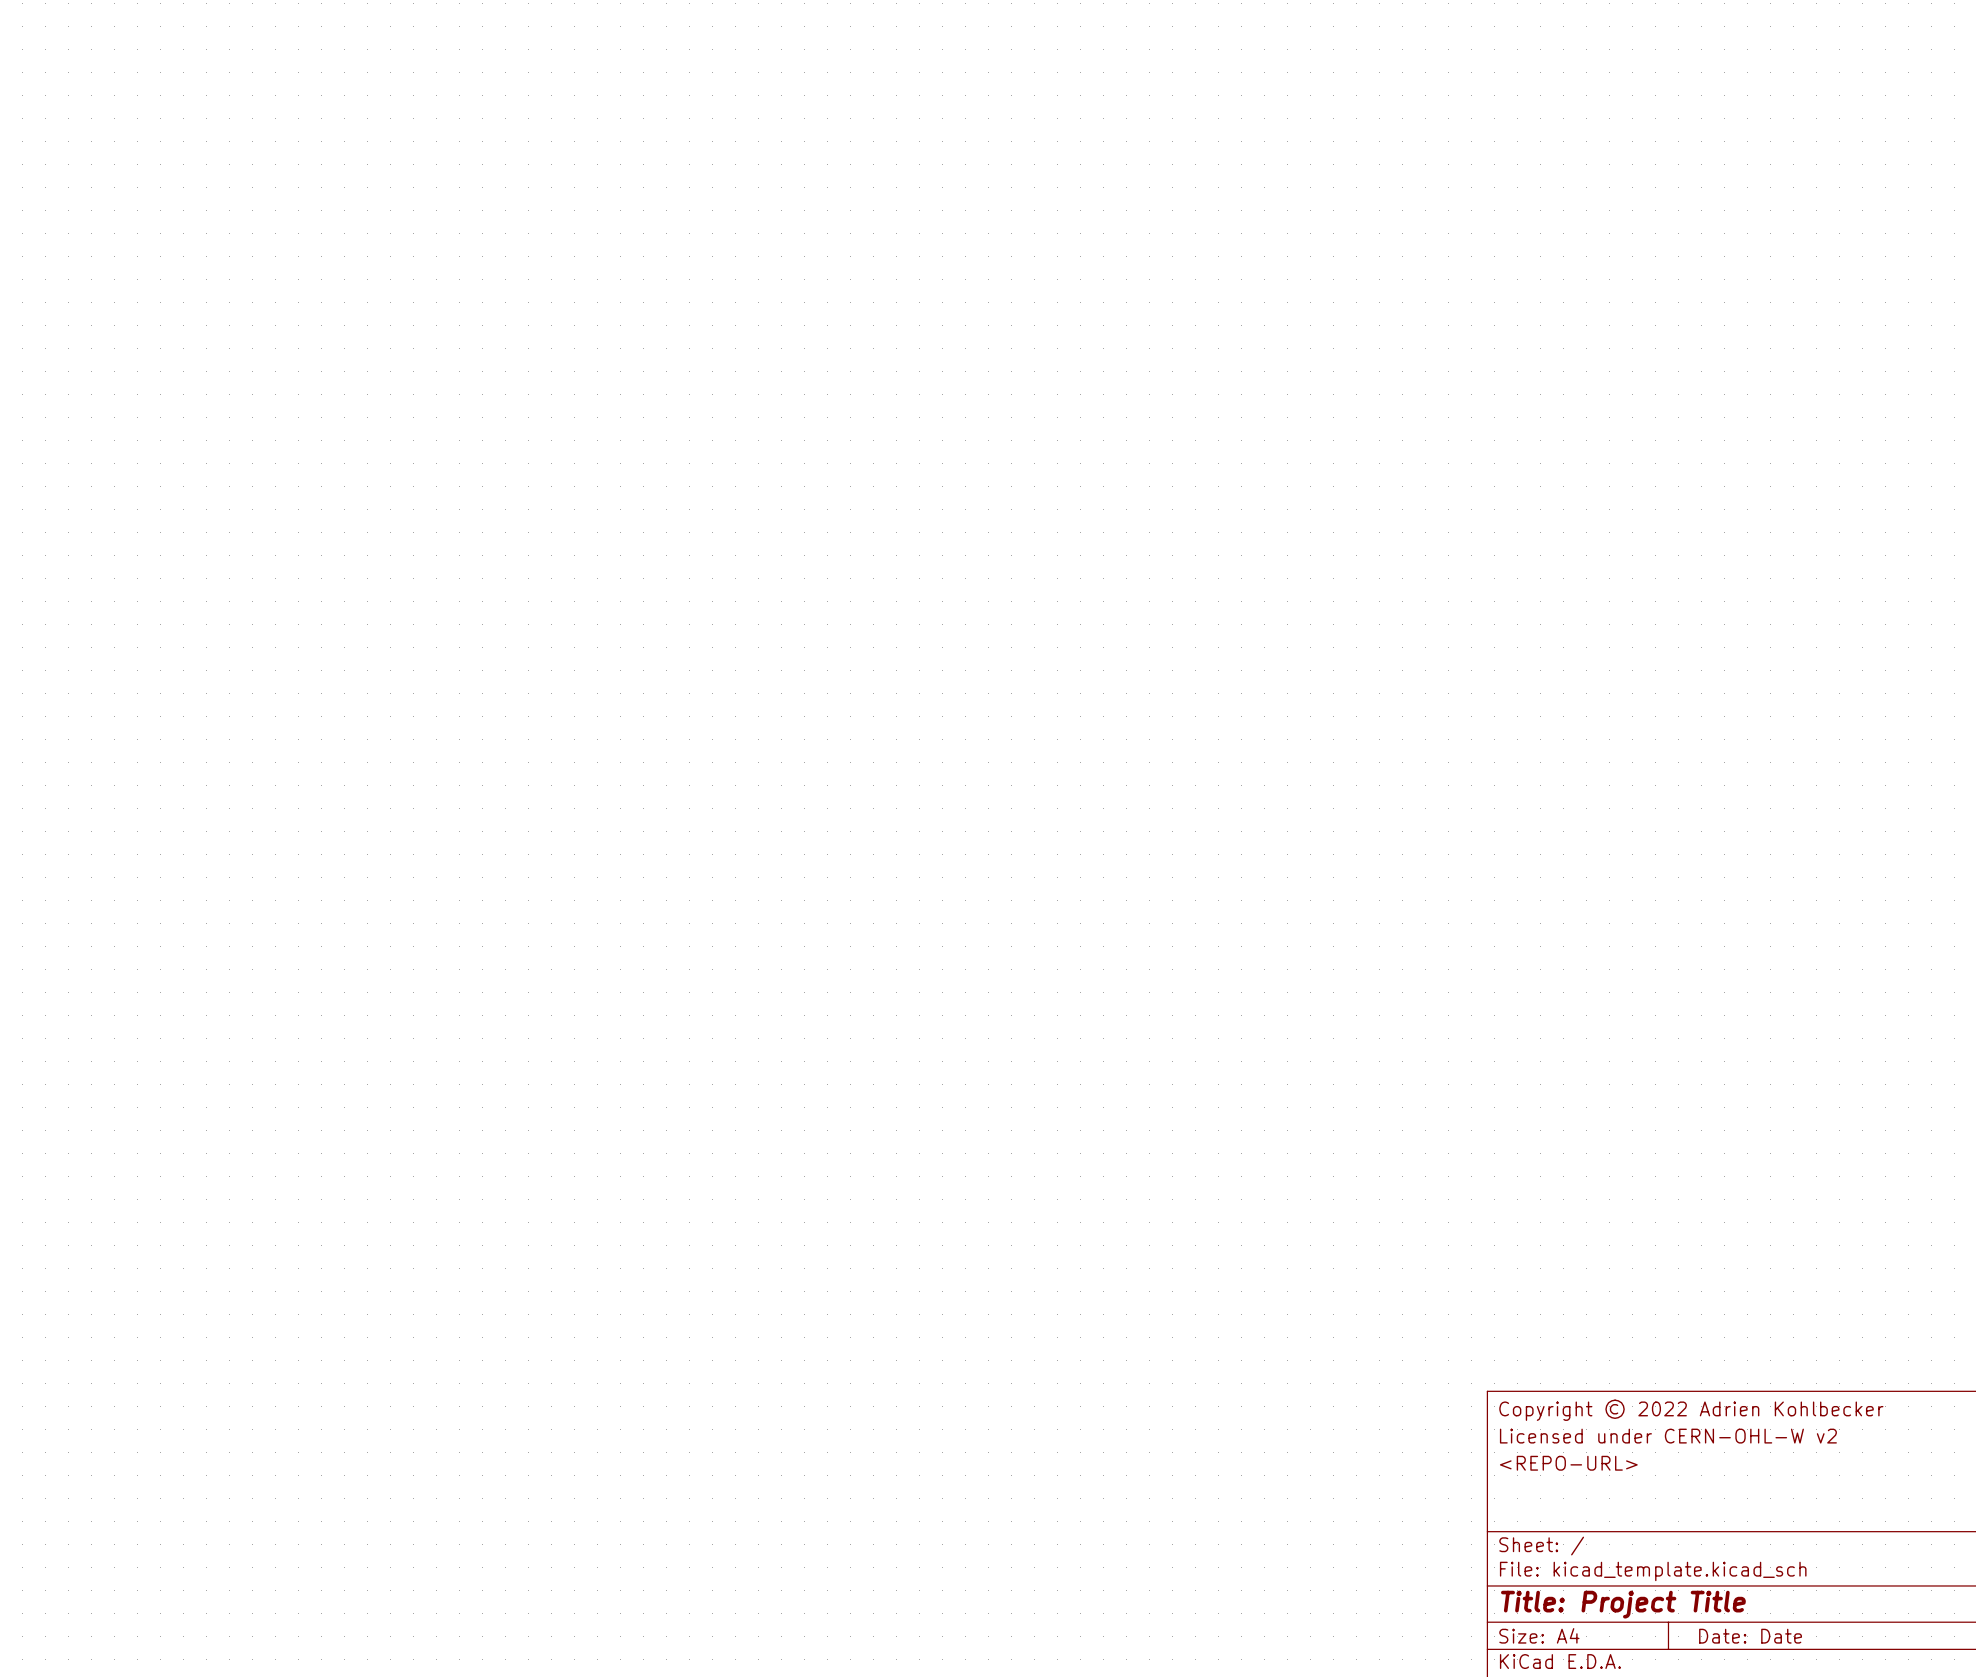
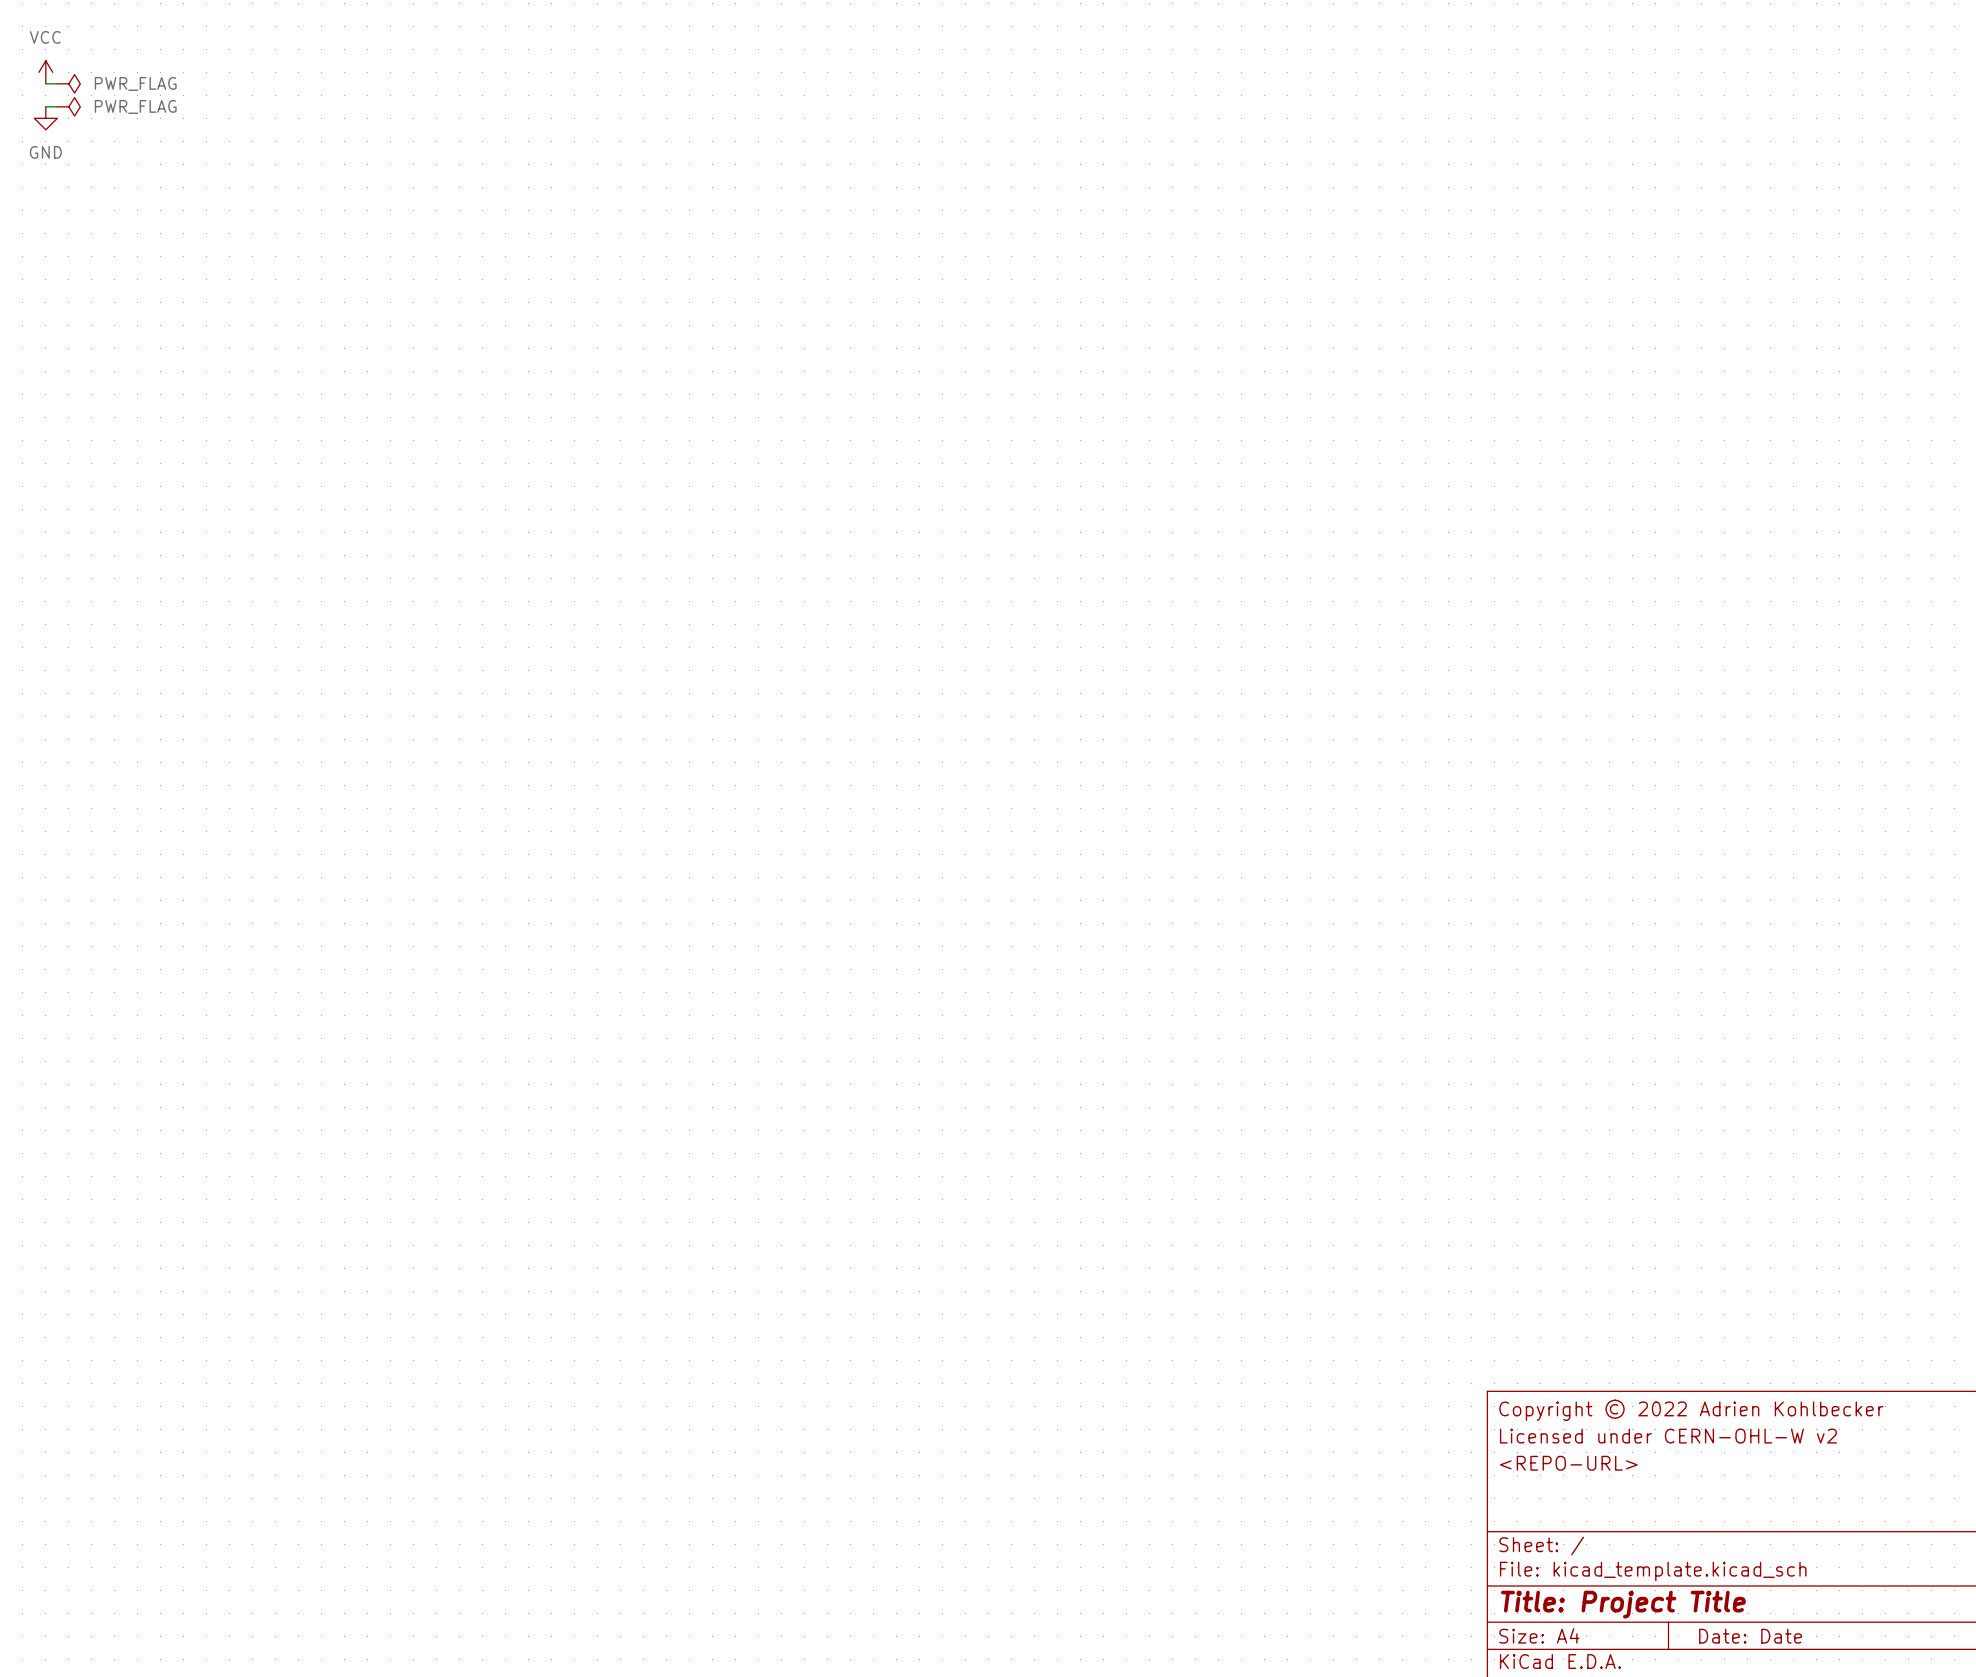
power symbol: none -> VCC (45, 72)
wire: none -> (45, 83) (57, 83)
power symbol: none -> PWR_FLAG (68, 83)
wire: none -> (45, 106) (57, 106)
power symbol: none -> PWR_FLAG (68, 106)
power symbol: none -> GND (45, 118)

